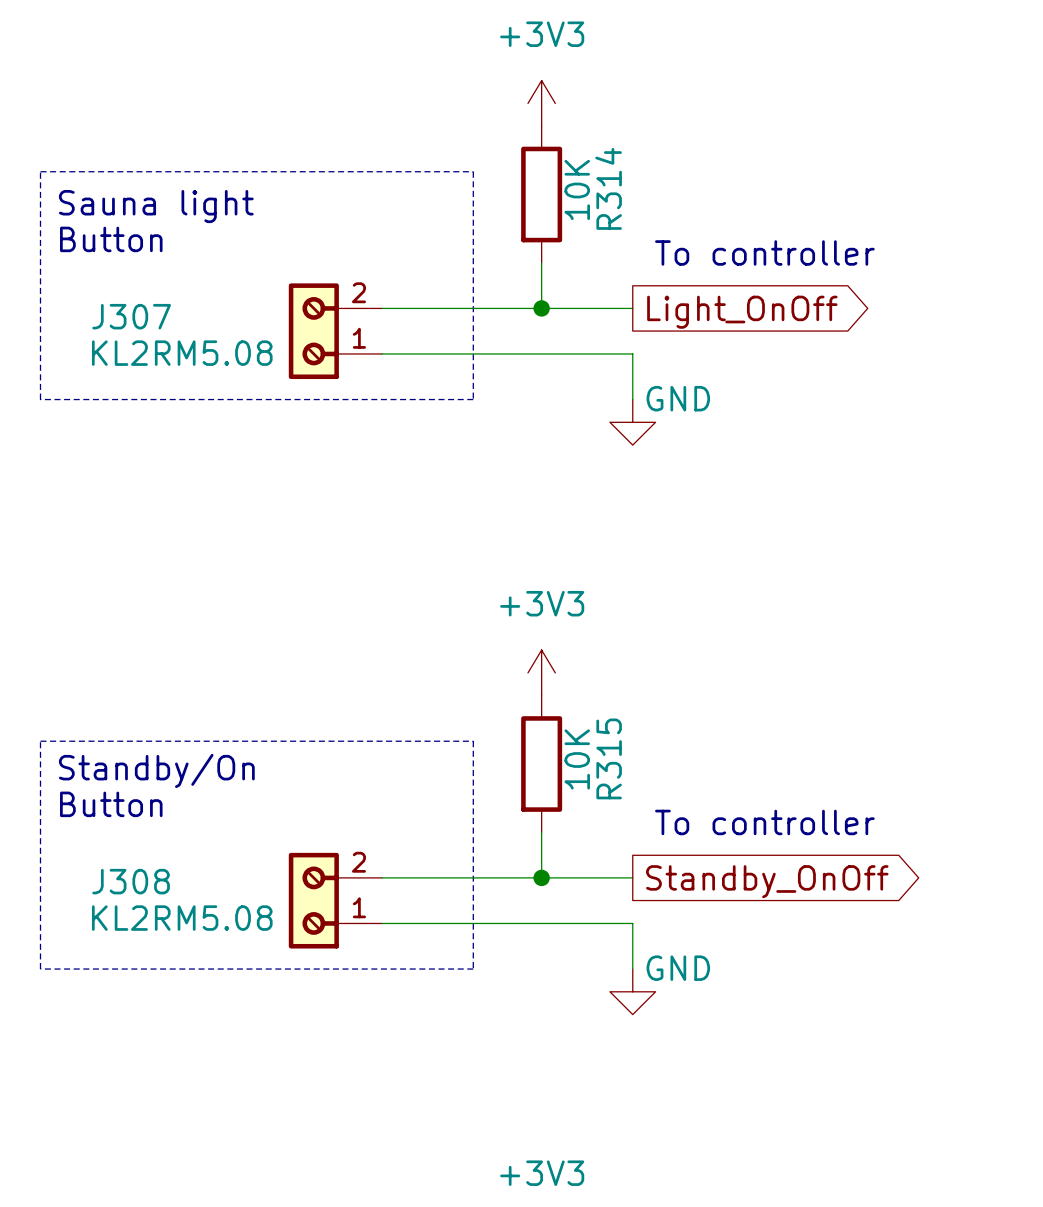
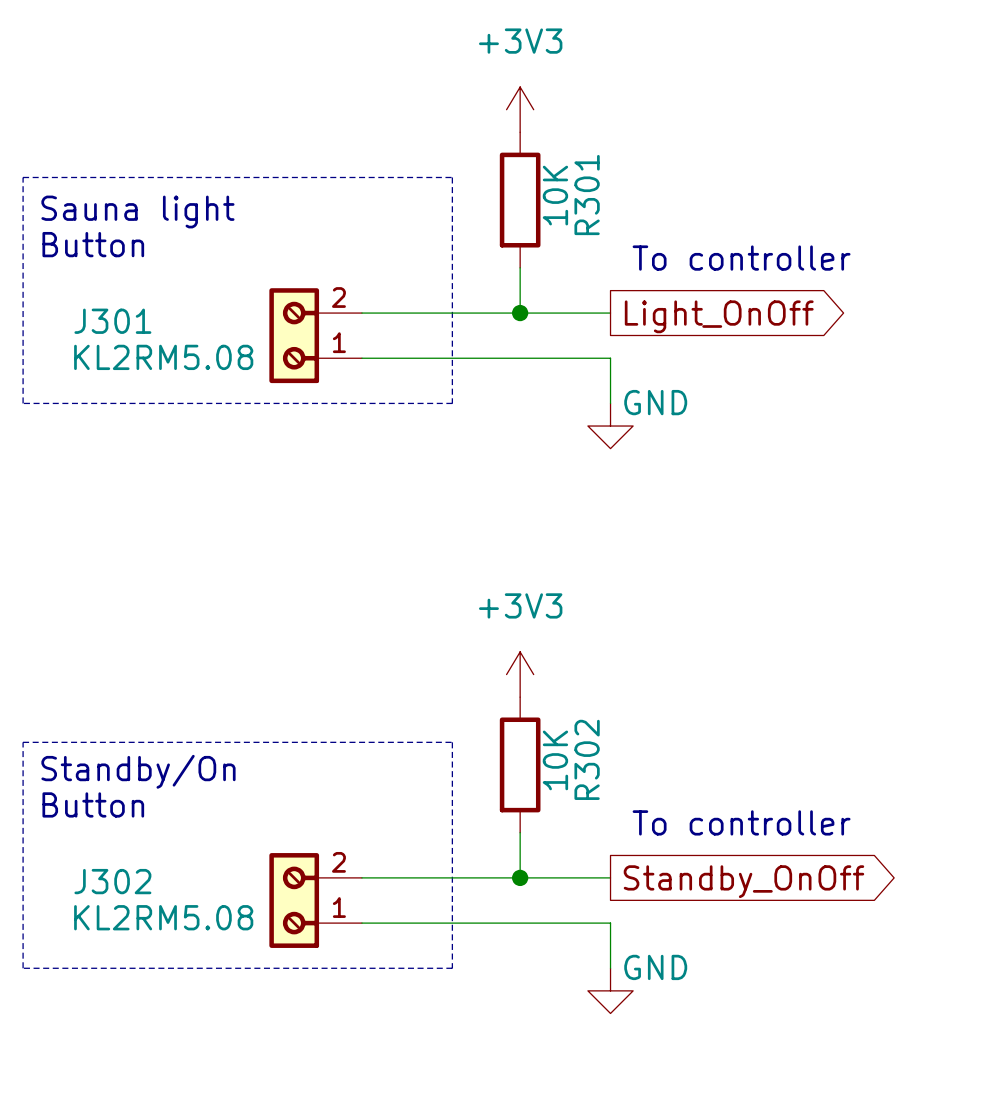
R314 name: R314 (608, 188) -> R301 (587, 195)
J307 name: J307 (131, 316) -> J301 (112, 321)
R315 name: R315 (609, 758) -> R302 (587, 759)
J308 name: J308 (131, 881) -> J302 (112, 881)

